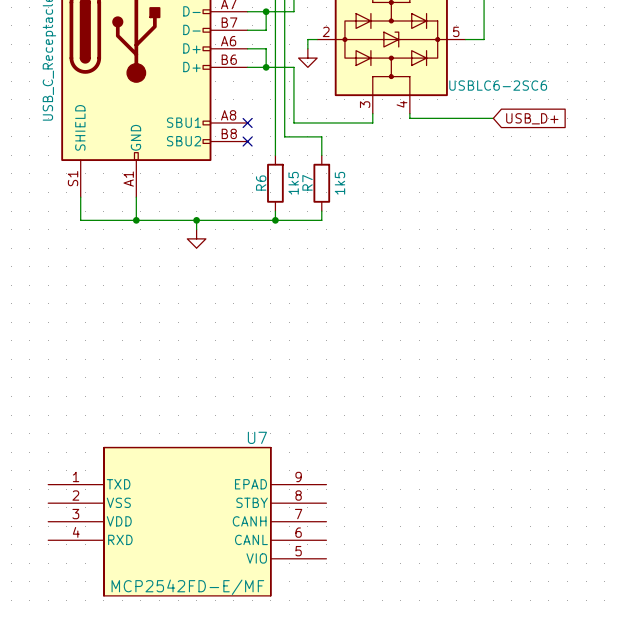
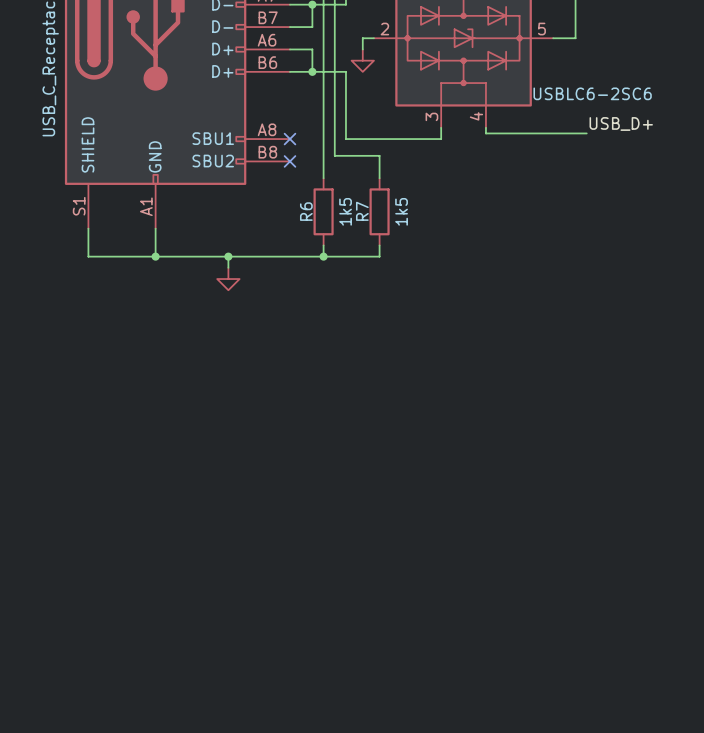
label: none -> USB_D+ (621, 123)
global label: USB_D+ (532, 118) -> none
U7: MCP2542FD-E/MF (187, 521) -> none

